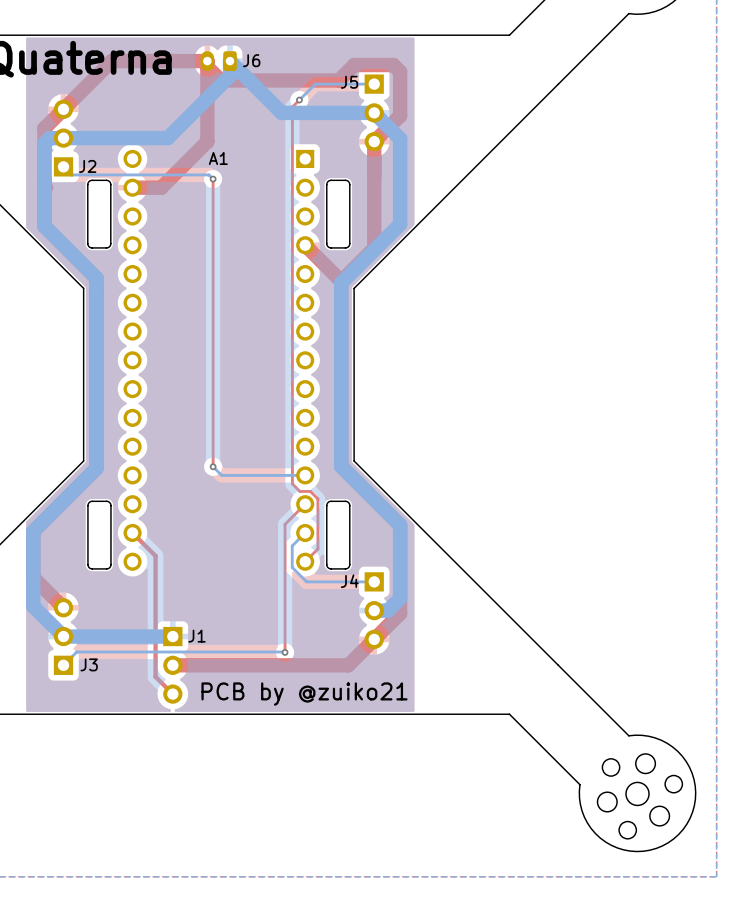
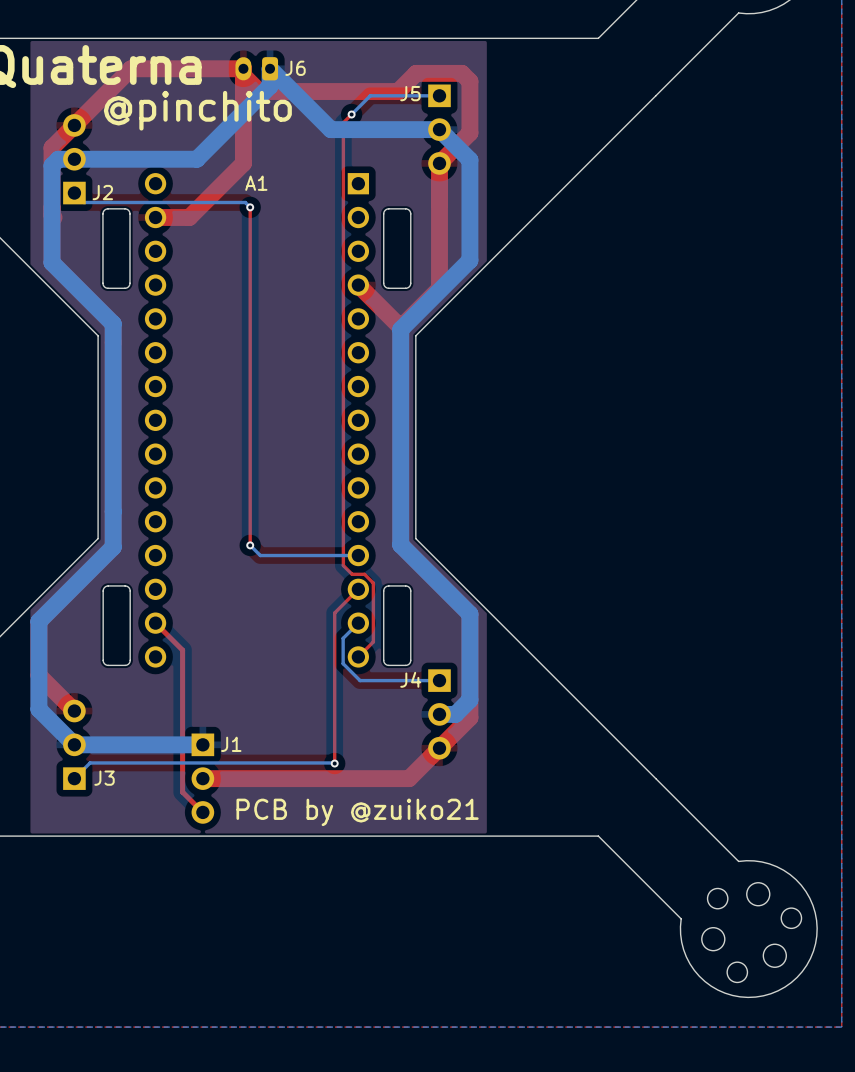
text: none -> @pinchito (197, 110)
round board edge: [625, 782, 650, 806] -> none

